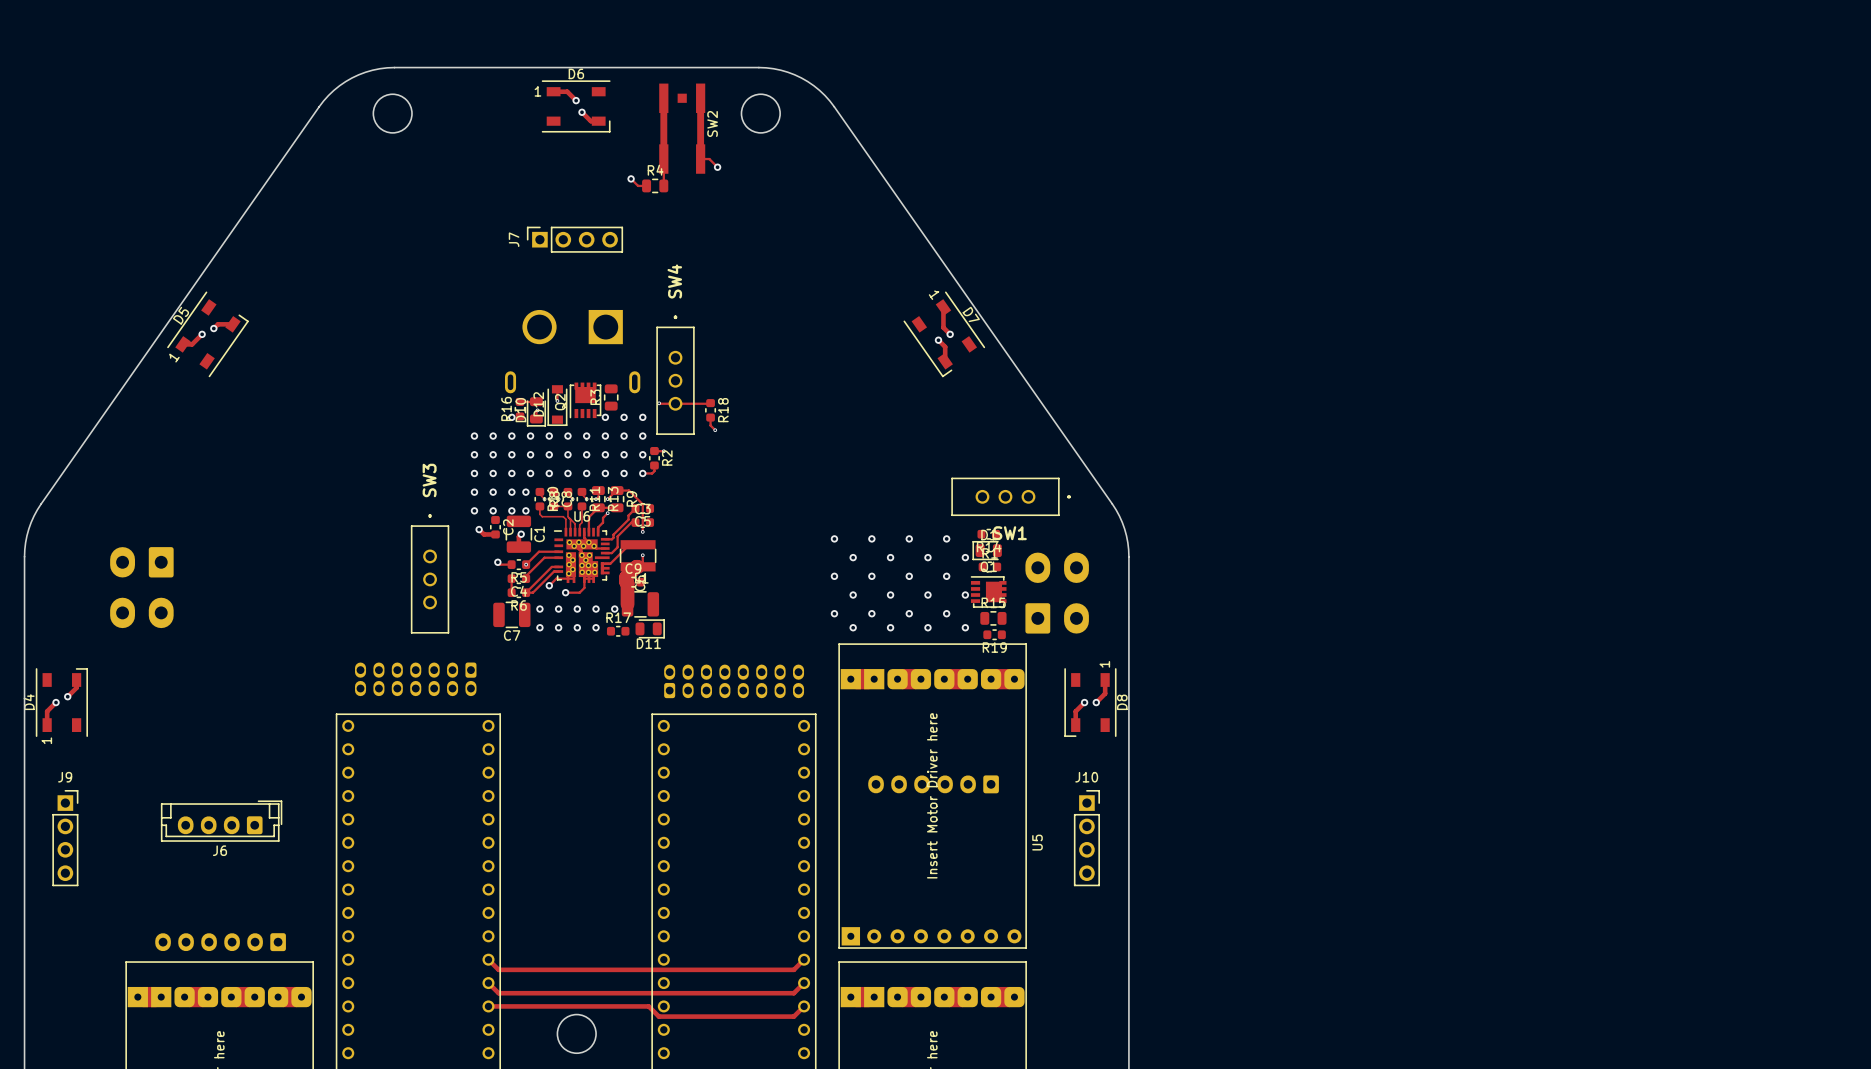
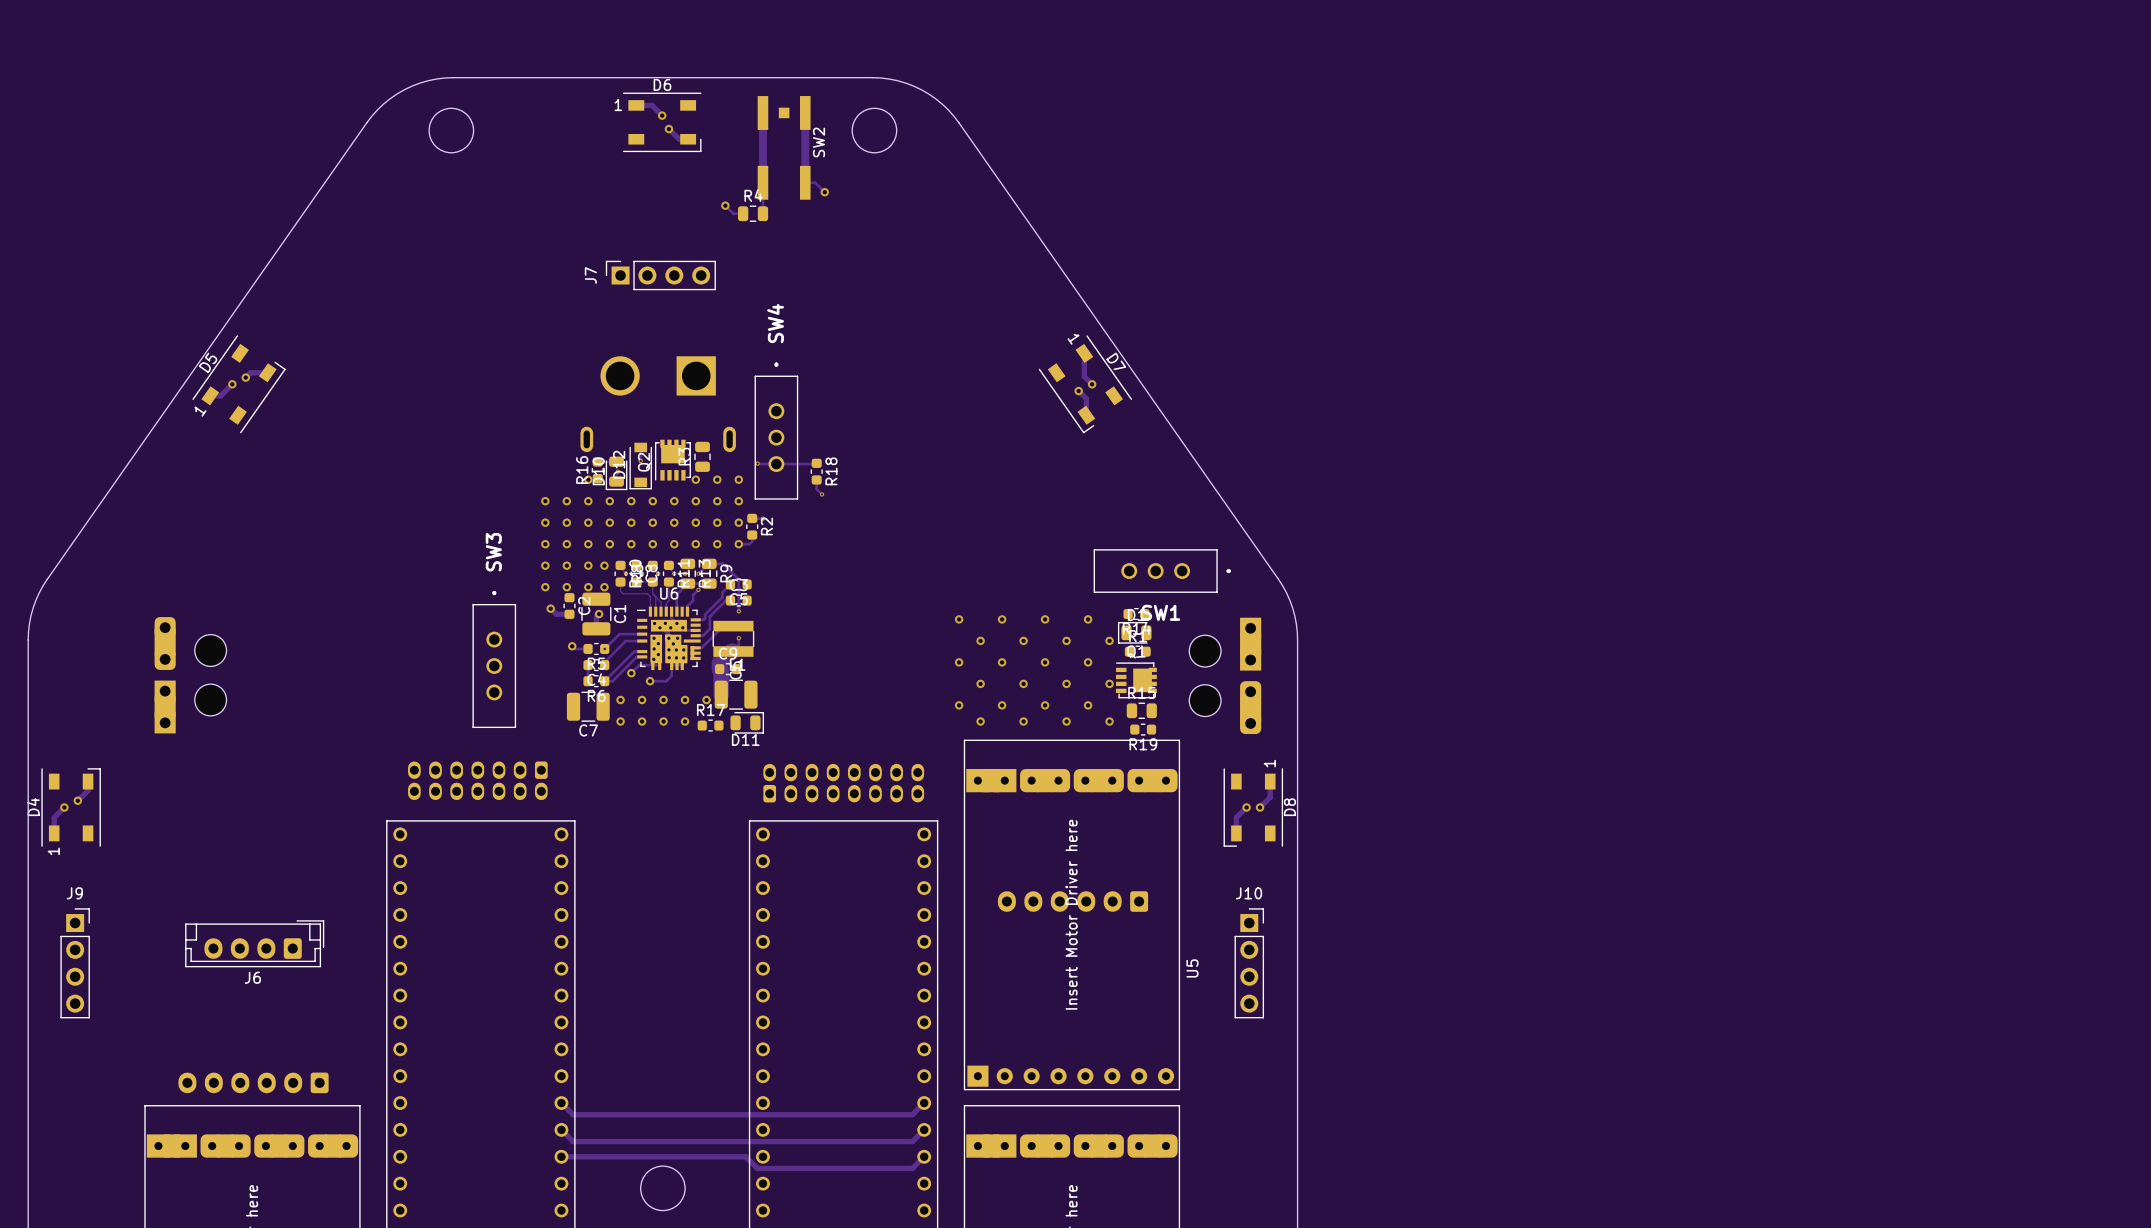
part: (141, 587) -> none
part: none -> (190, 675)
part: none -> (1225, 675)
part: (1057, 593) -> none

